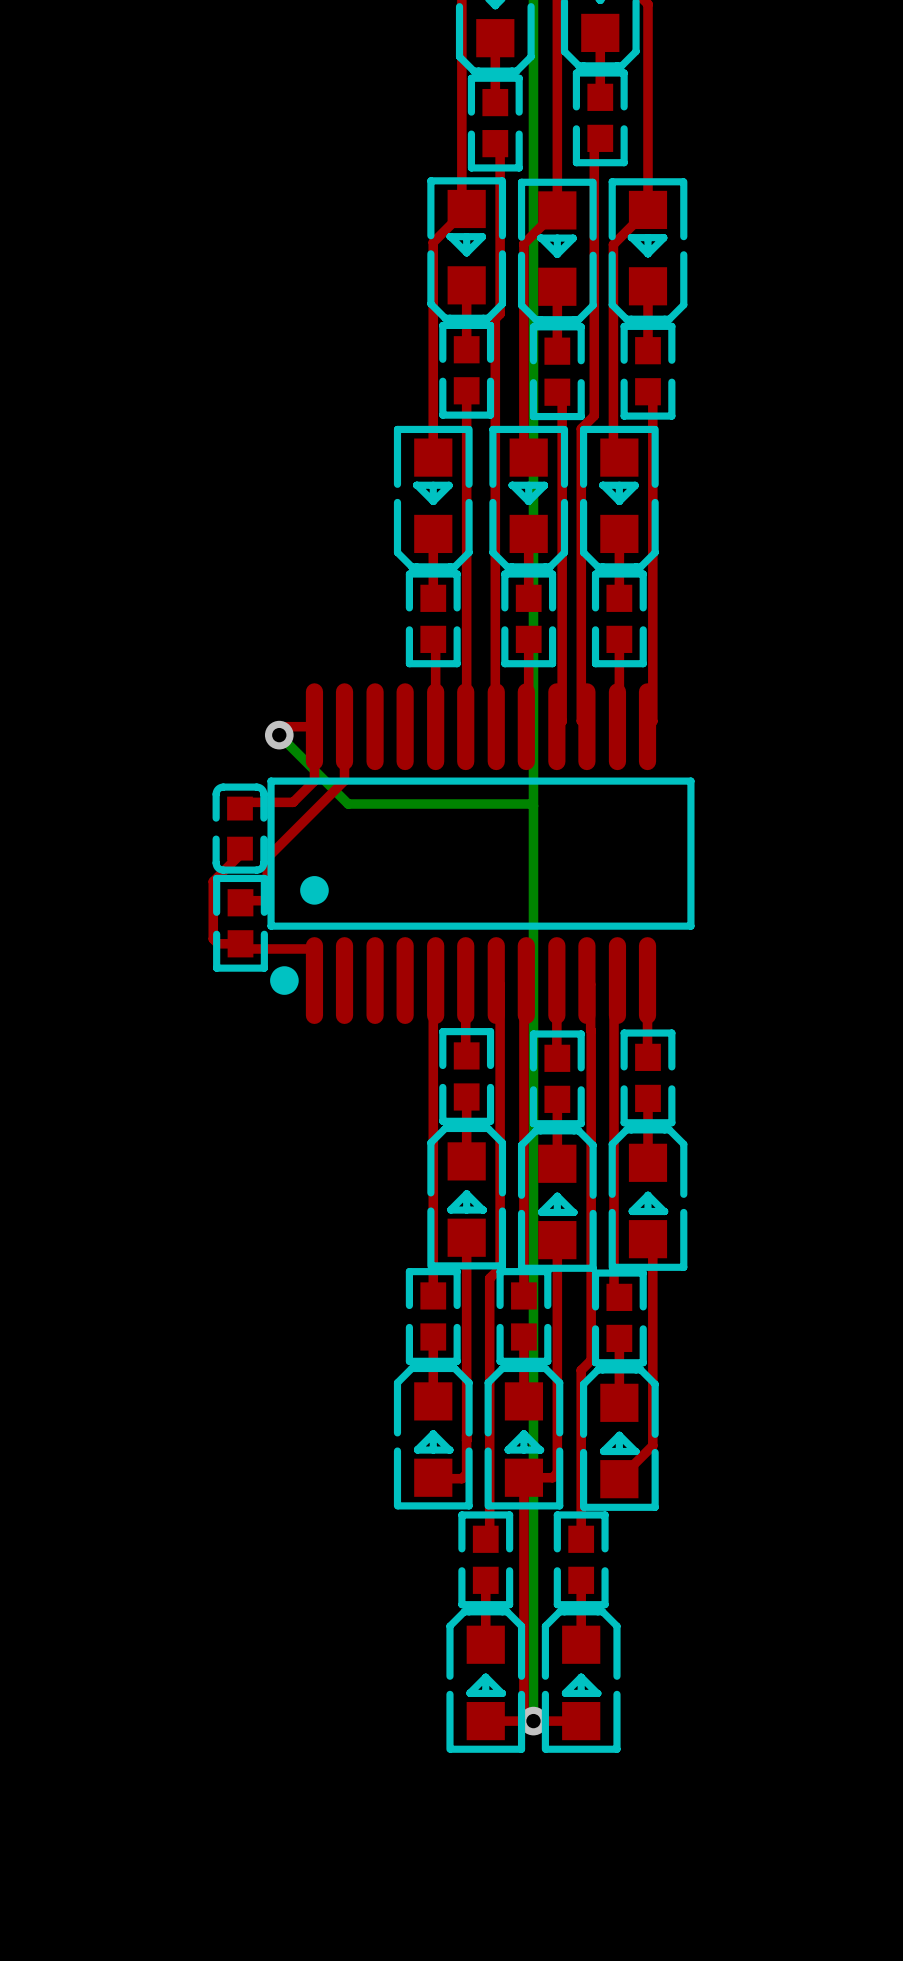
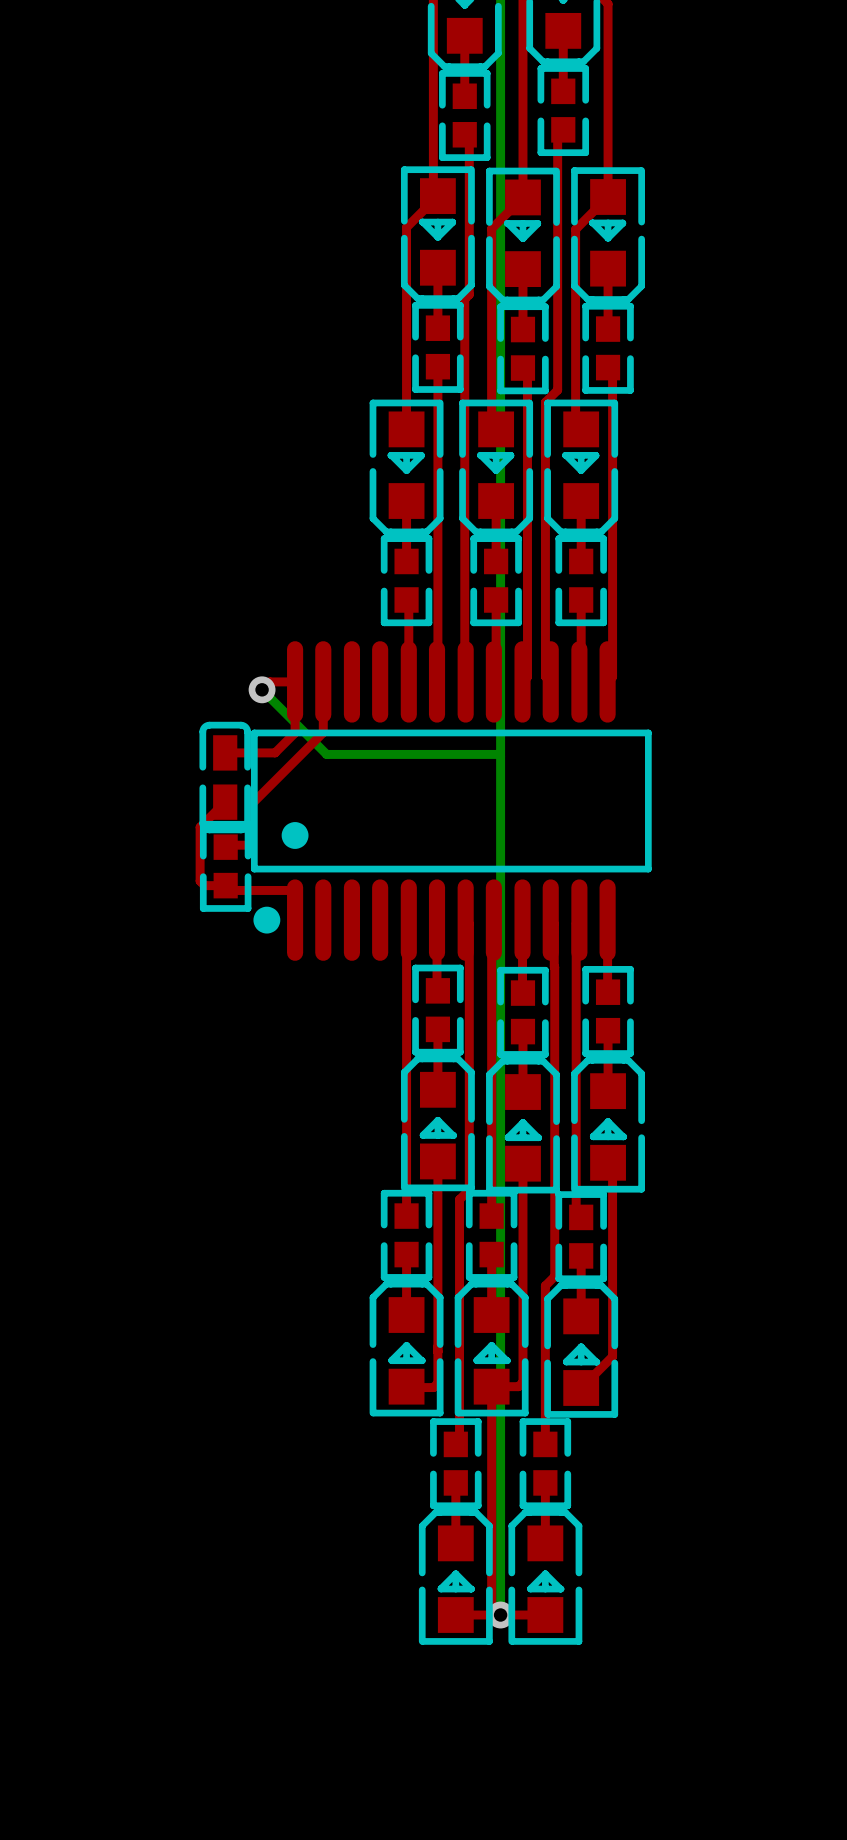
part footprint: [212, 783, 268, 874] -> [199, 721, 251, 834]

